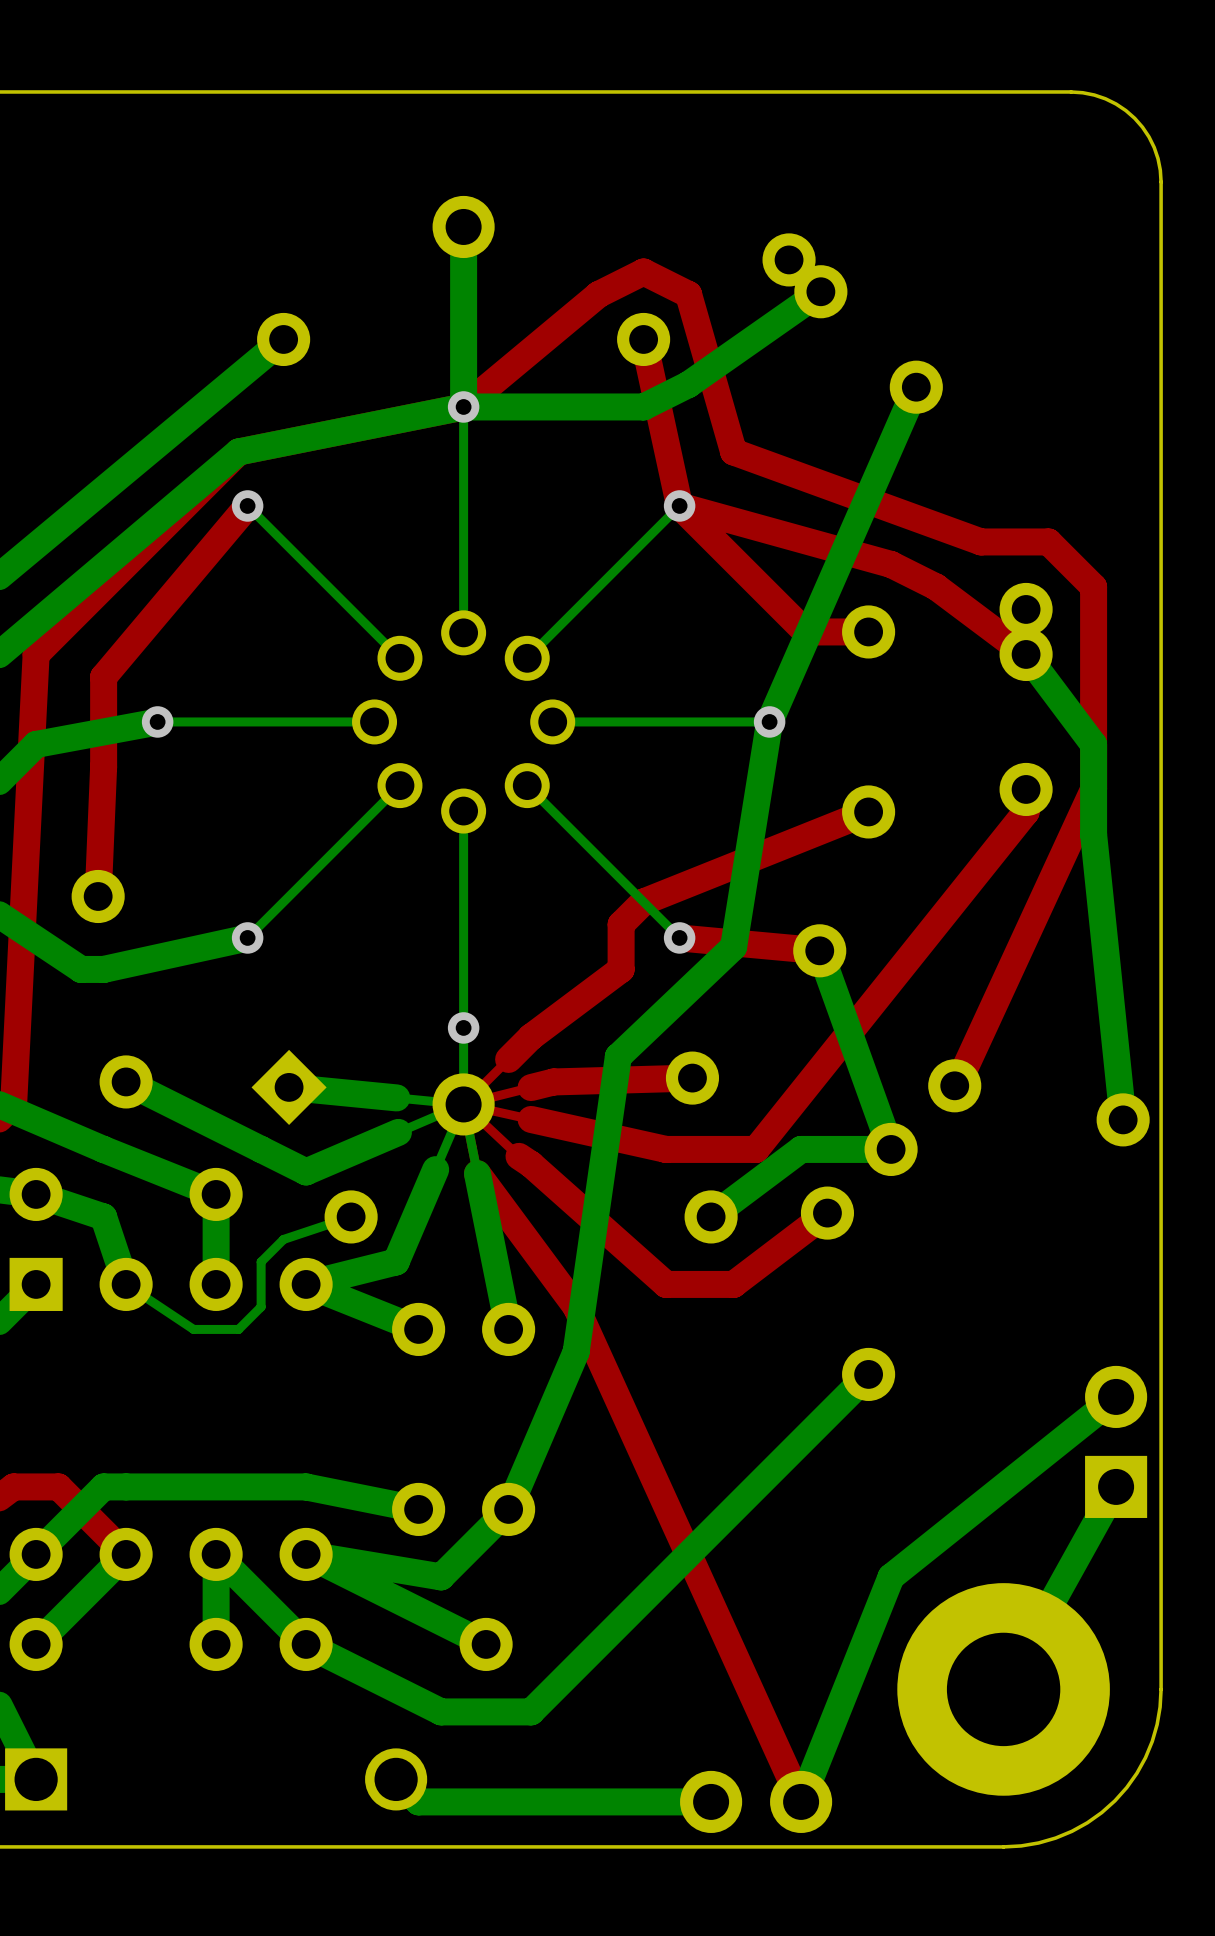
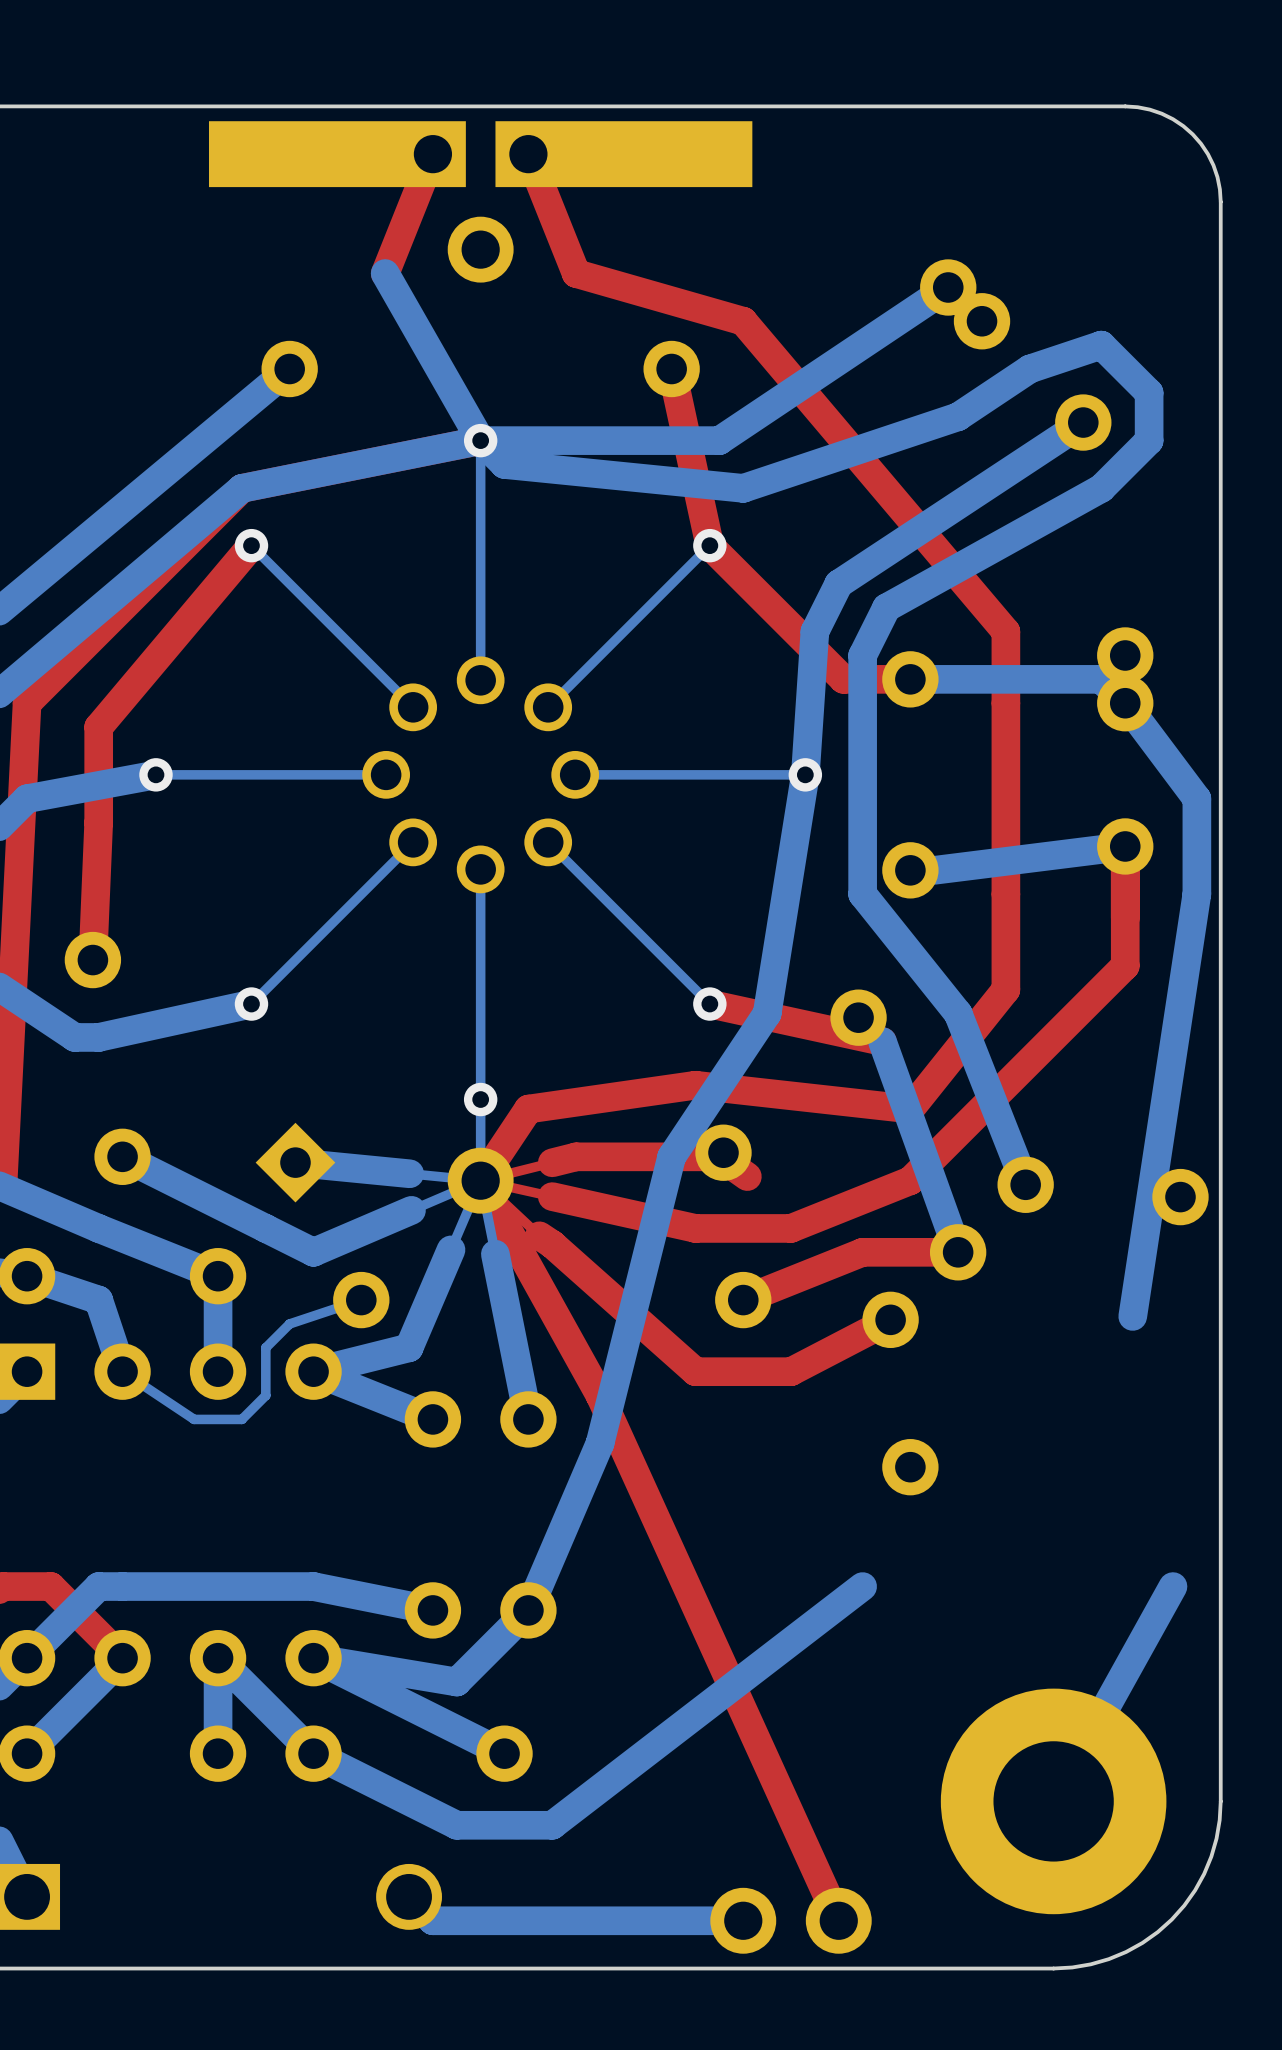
part: none -> (337, 154)
top track: none -> (432, 154) (385, 273)
part: none -> (623, 154)
bottom track: (463, 226) (463, 406) -> none
bottom track: none -> (385, 273) (480, 440) (504, 464) (743, 488) (958, 416) (1029, 369) (1101, 345) (1149, 392) (1149, 440) (1101, 488) (886, 607) (862, 655) (862, 894) (958, 1013) (1025, 1184)
bottom track: (789, 259) (820, 291) (688, 384) (643, 406) -> (982, 321) (948, 287) (719, 440) (671, 440)
part position: (852, 323) -> (1015, 355)
bottom track: (916, 387) (769, 721) -> (1083, 422) (838, 583) (814, 631) (805, 774)
top track: (463, 406) (598, 294) (643, 271) (688, 294) (733, 451) (981, 541) (1048, 541) (1093, 586) (1093, 789) (958, 1081) (954, 1085) -> none
top track: (679, 505) (891, 564) (936, 586) (1026, 654) -> none
bottom track: (1026, 609) (1026, 654) (1093, 744) (1093, 834) (1123, 1119) -> none
bottom track: none -> (934, 679) (1101, 679) (1125, 703)
bottom track: none -> (1125, 703) (1196, 798) (1196, 894) (1132, 1316)
part position: (1026, 699) -> (1125, 750)
top track: (1026, 789) (1026, 811) (756, 1149) -> (1125, 846) (1125, 965) (910, 1180) (791, 1228)
bottom track: none -> (1125, 846) (934, 870)
top track: (868, 811) (643, 901) (621, 924) (621, 969) (531, 1036) (463, 1104) (477, 1173) (576, 1306) -> (528, 154) (576, 273) (743, 321) (1005, 631) (1005, 989) (910, 1109) (695, 1085) (528, 1109) (480, 1180) (600, 1395)
top track: (679, 937) (819, 950) -> (709, 1004) (882, 1041)
bottom track: (733, 946) (618, 1056) (576, 1351) -> (767, 1013) (671, 1156) (600, 1443)
bottom track: (819, 950) (891, 1149) (801, 1149) (711, 1216) -> none
bottom track: none -> (882, 1041) (958, 1252)
top track: (696, 1074) (692, 1078) (553, 1081) -> (747, 1176) (719, 1156) (576, 1156)
part position: (891, 1149) -> (958, 1252)
top track: none -> (958, 1252) (862, 1252) (743, 1300)
top track: (827, 1213) (733, 1284) -> (890, 1319) (791, 1371) (767, 1371)
bottom track: (868, 1374) (531, 1711) -> (862, 1586) (552, 1825)
bottom track: (1116, 1396) (891, 1576) (801, 1801) -> none
part: (1116, 1441) -> none

